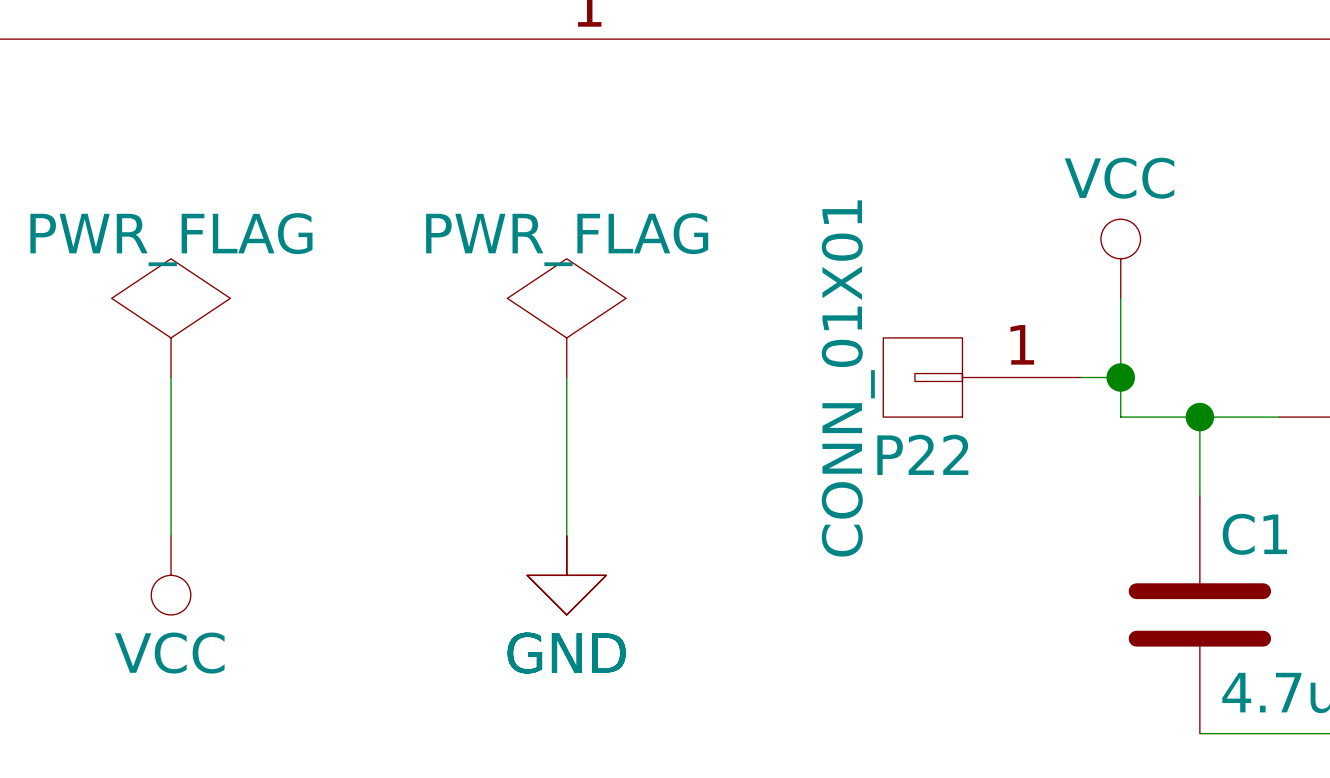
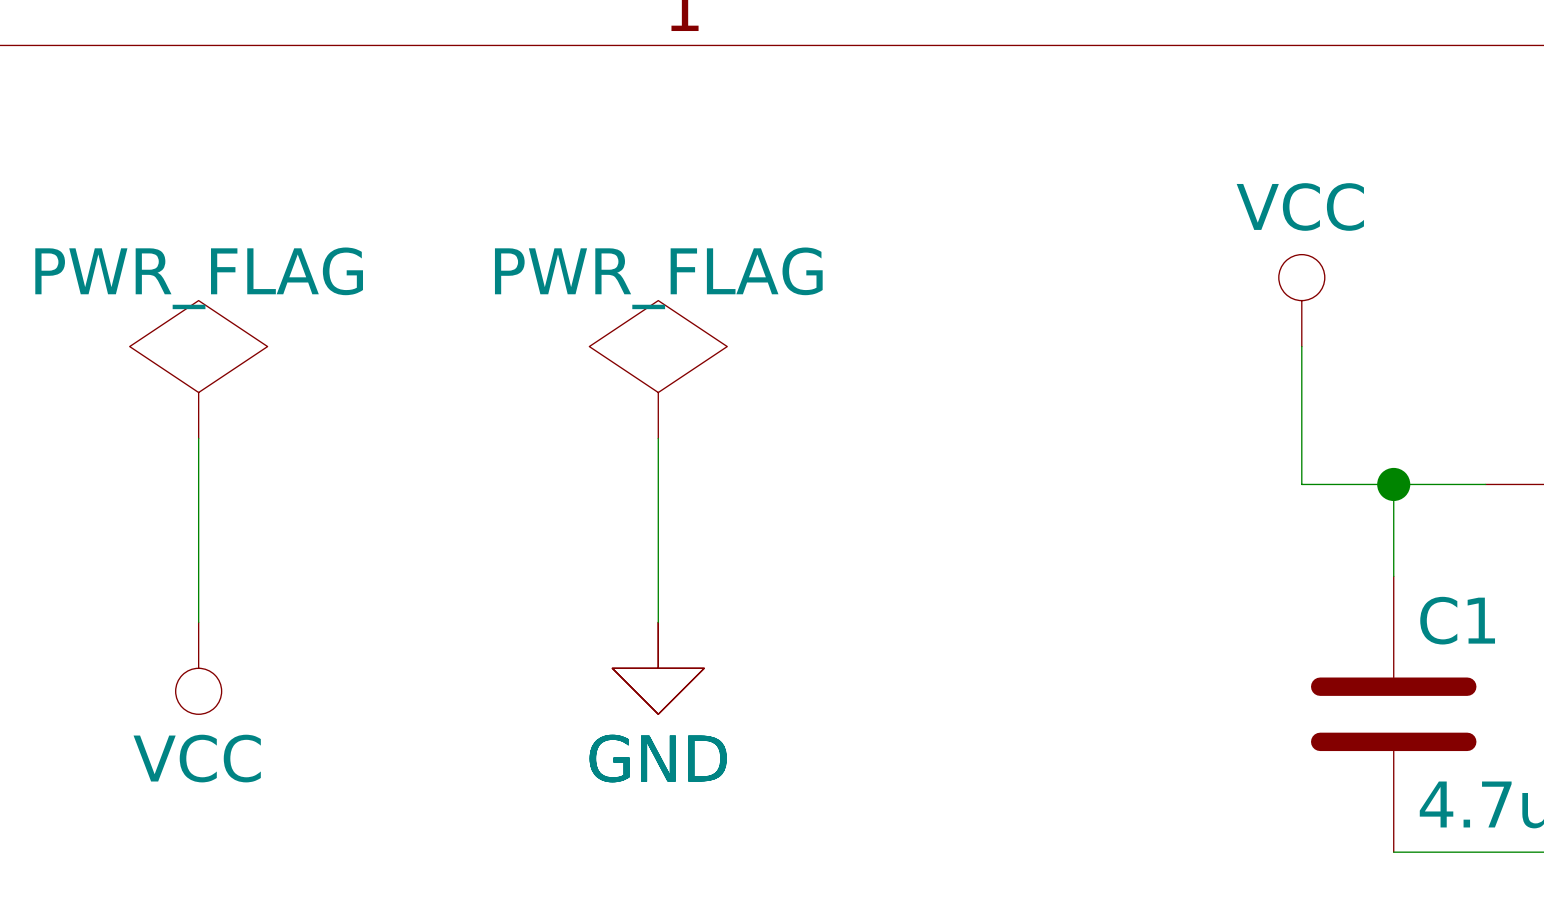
P22: CONN_01X01 (982, 377) -> none
wire: (1081, 377) (1120, 377) -> none
junction: (1120, 377) -> none

